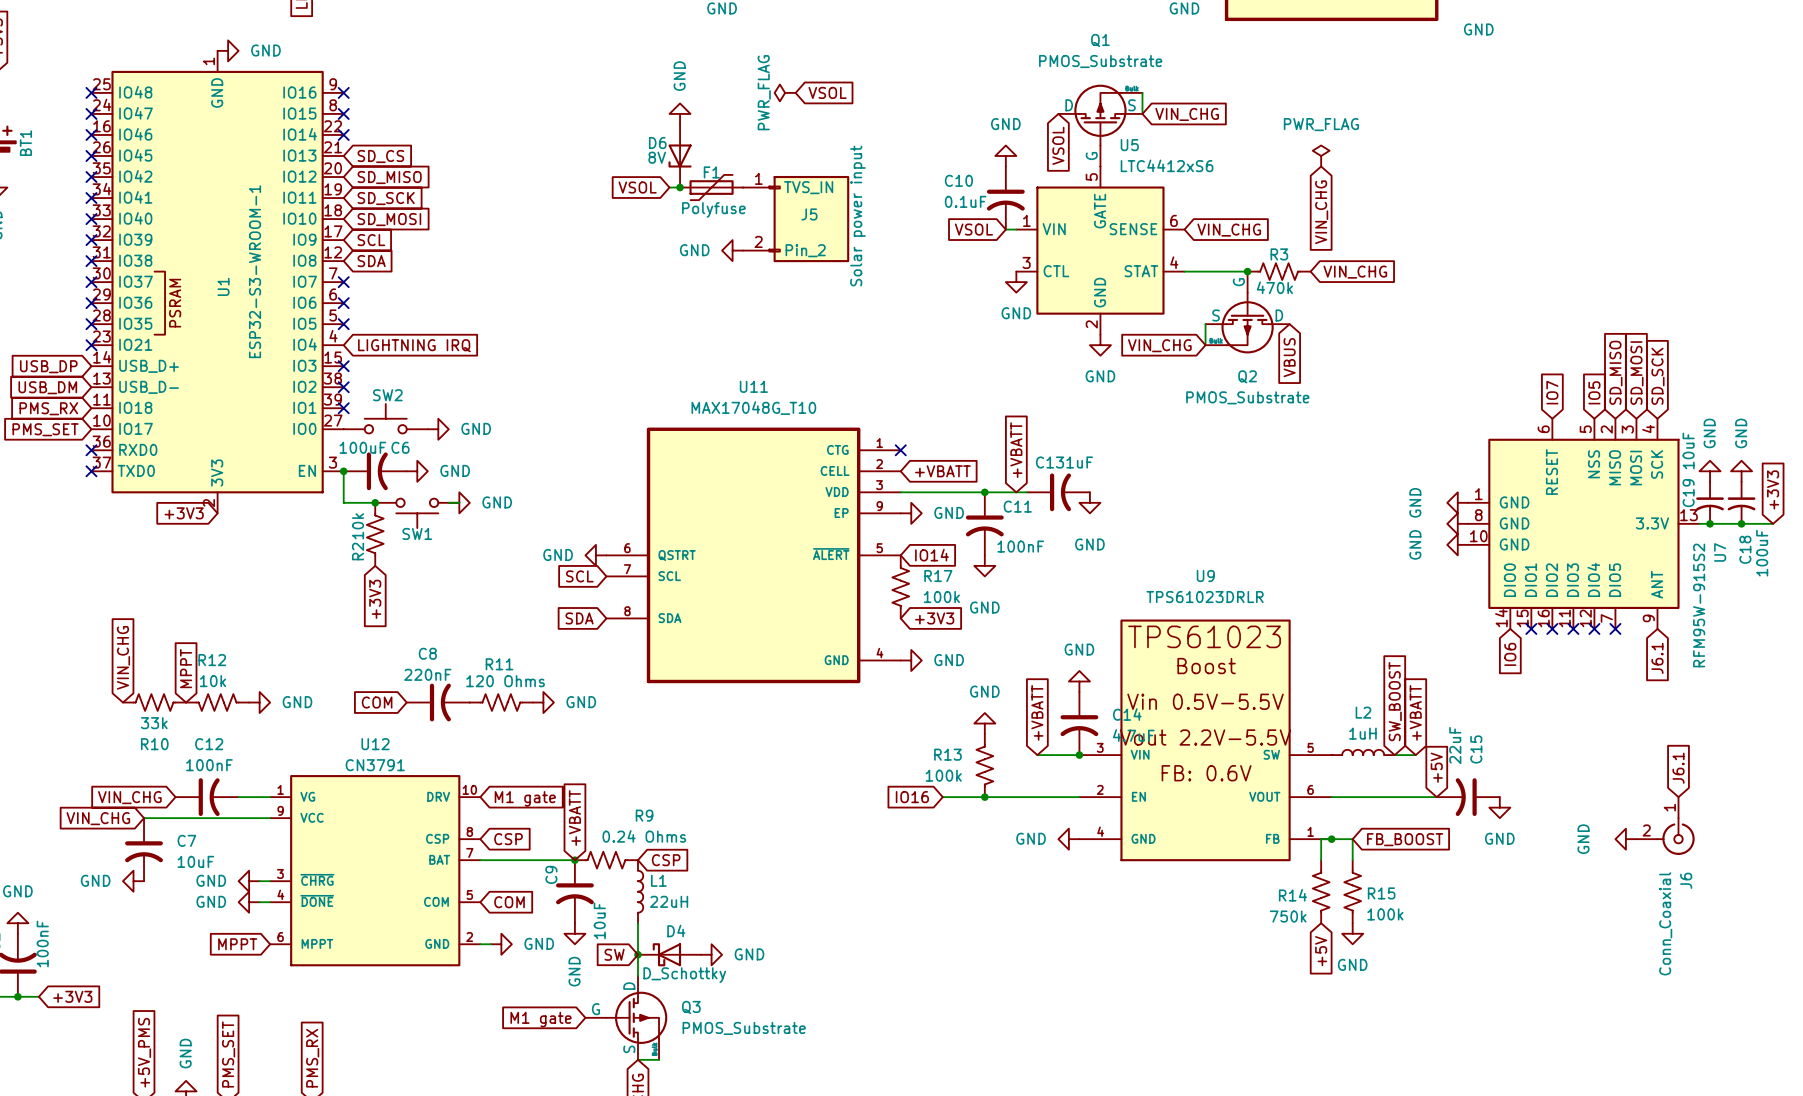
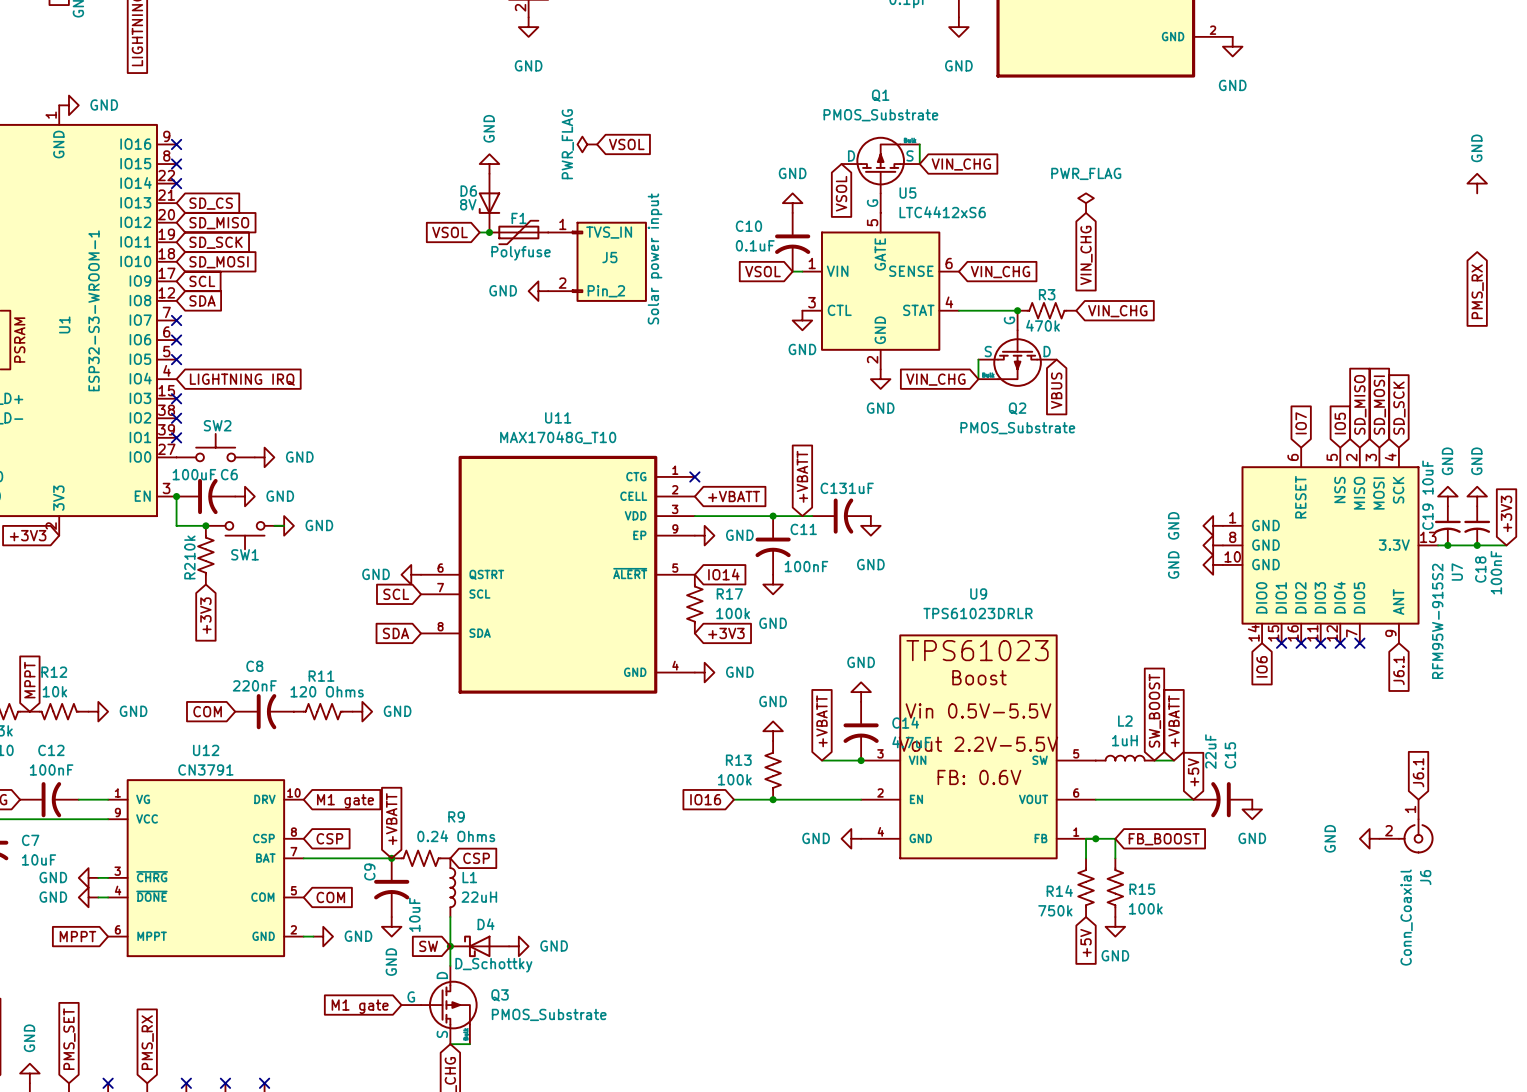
power symbol: none -> GND (1477, 183)
global label: none -> PMS_RX (1477, 291)
C18 value: 100uF (1762, 553) -> 100nF (1496, 572)

